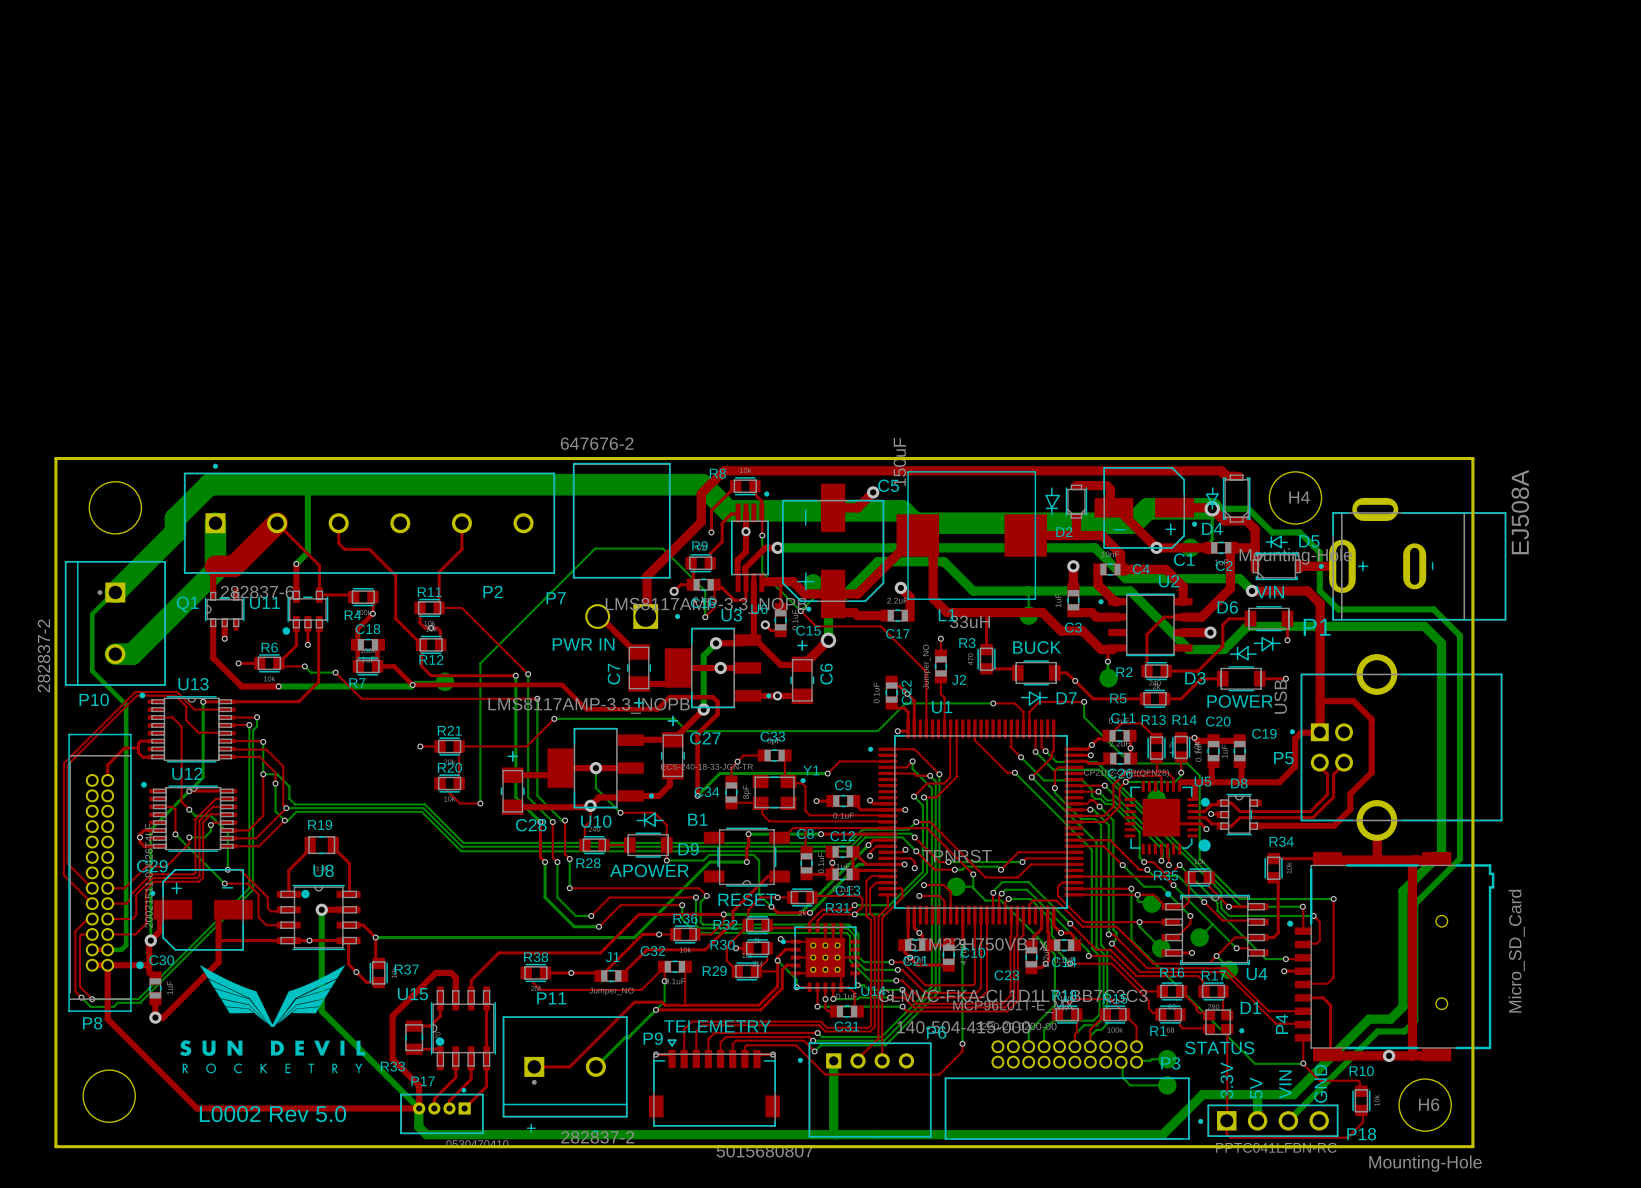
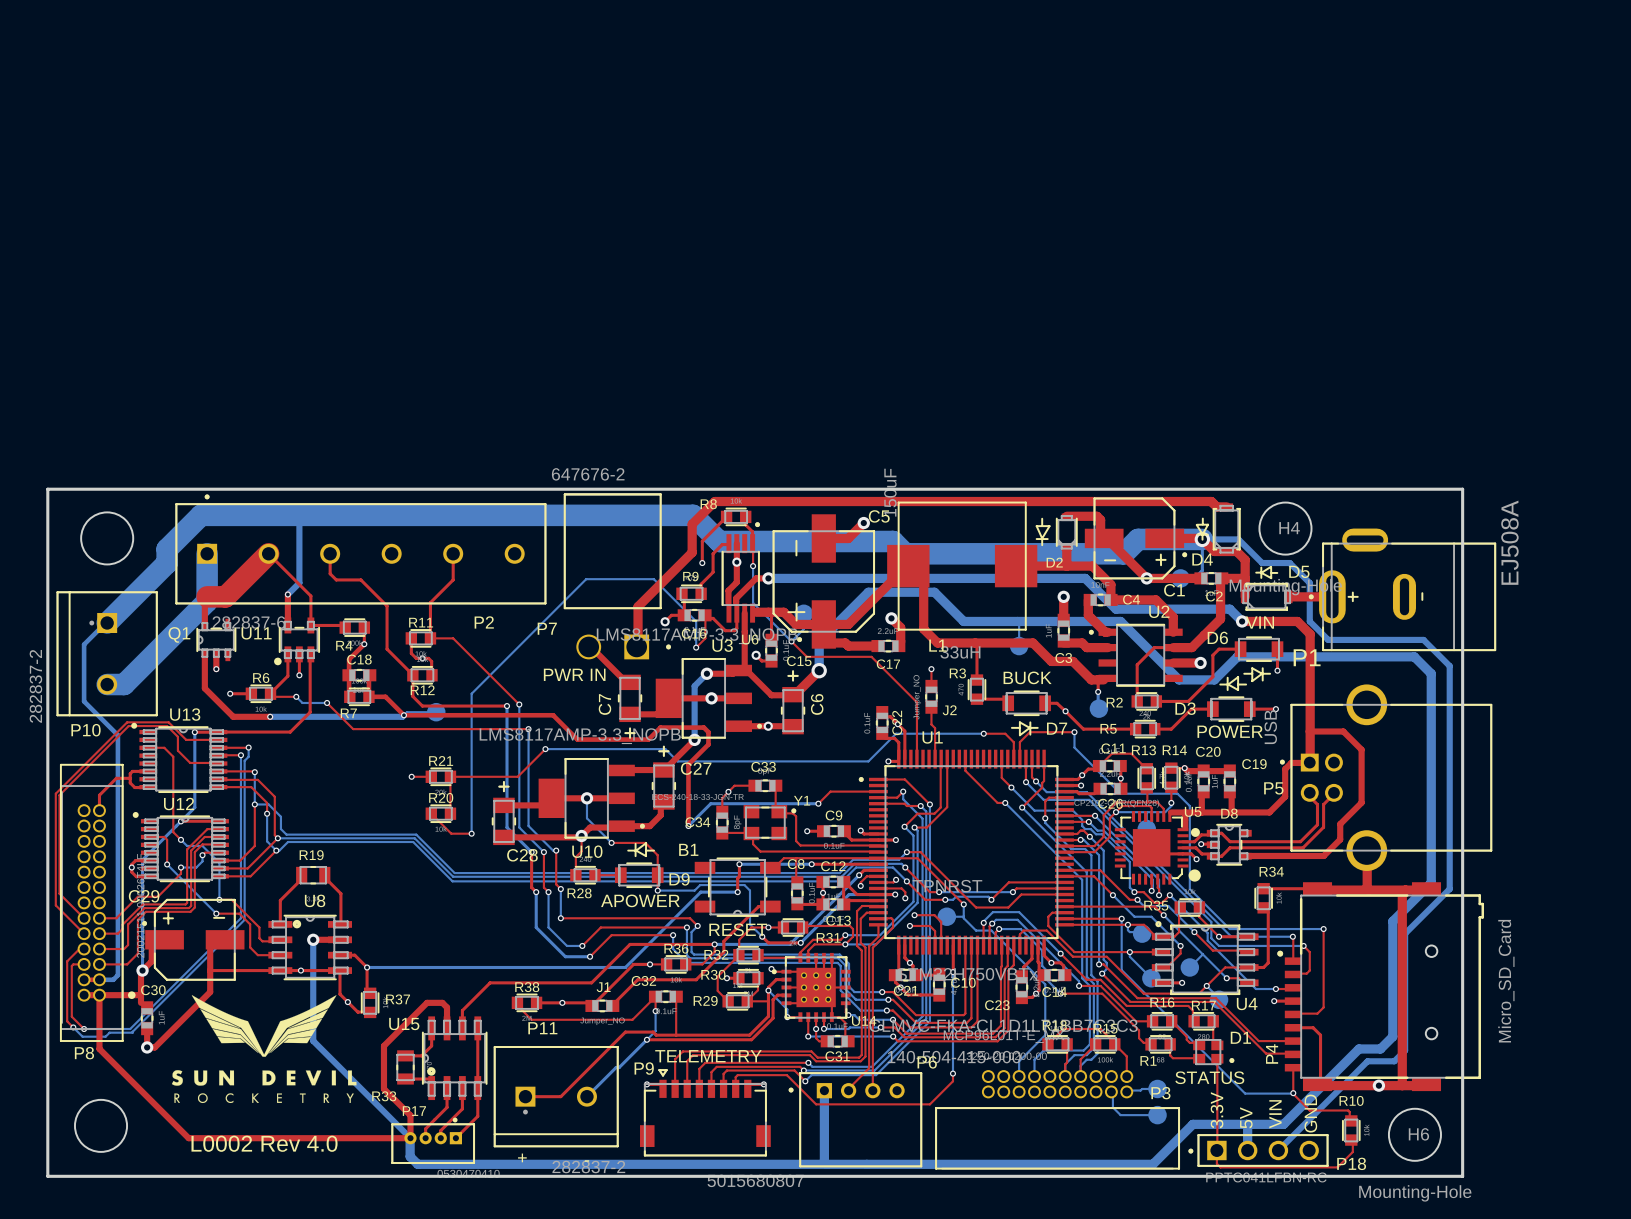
text: L0002 Rev 5.0 (272, 1114) -> L0002 Rev 4.0 (264, 1143)

